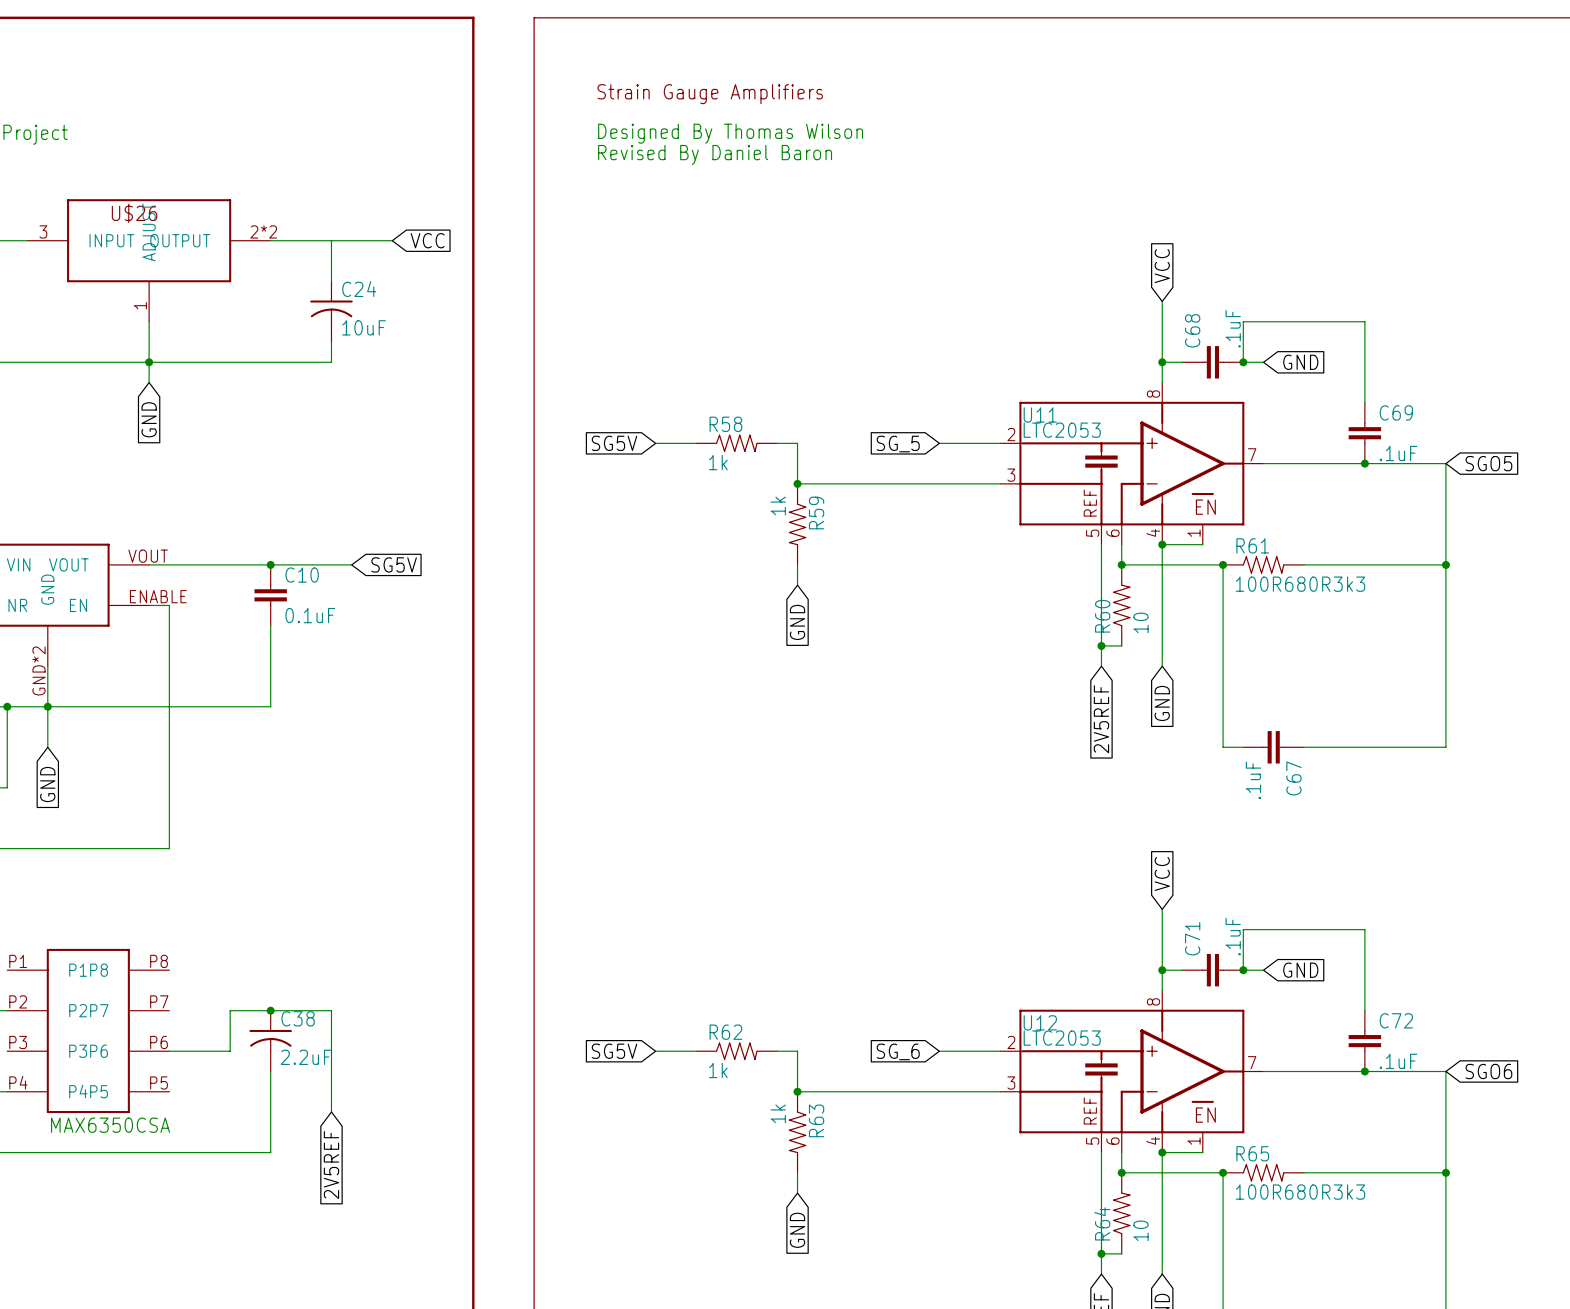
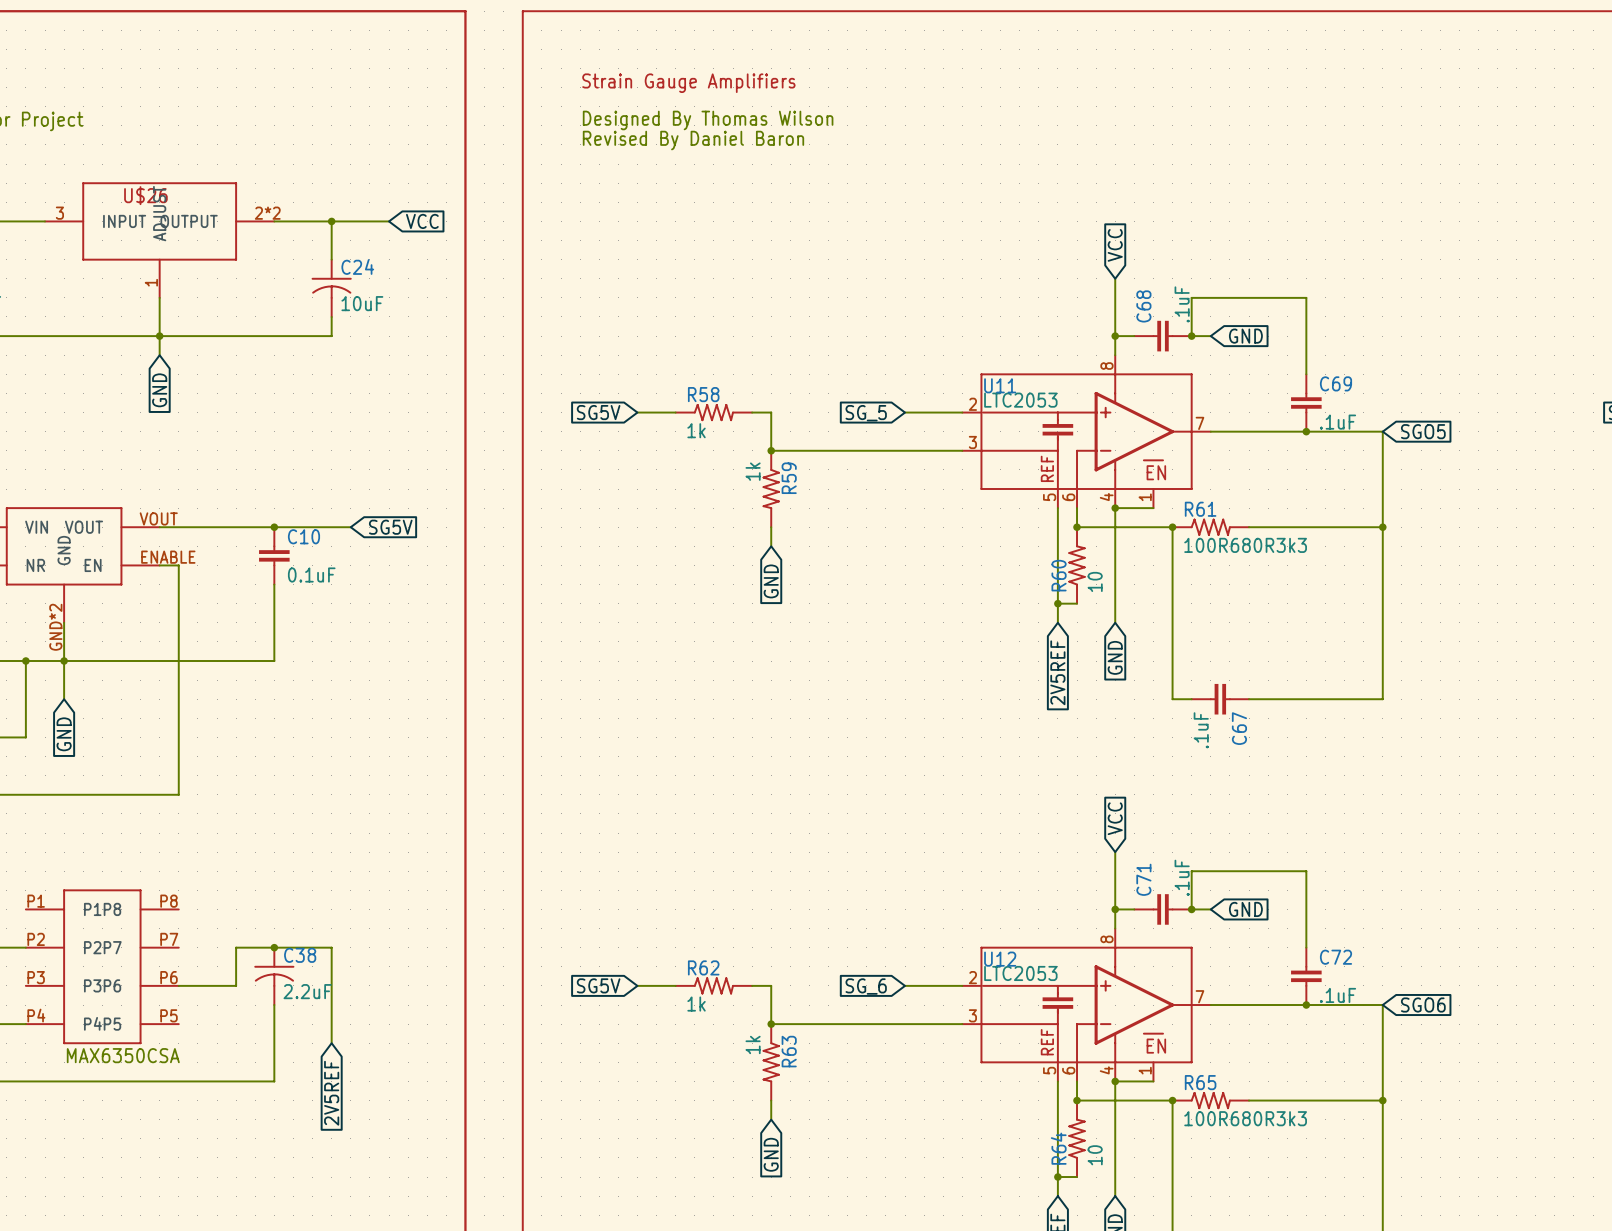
junction: none -> (331, 221)

